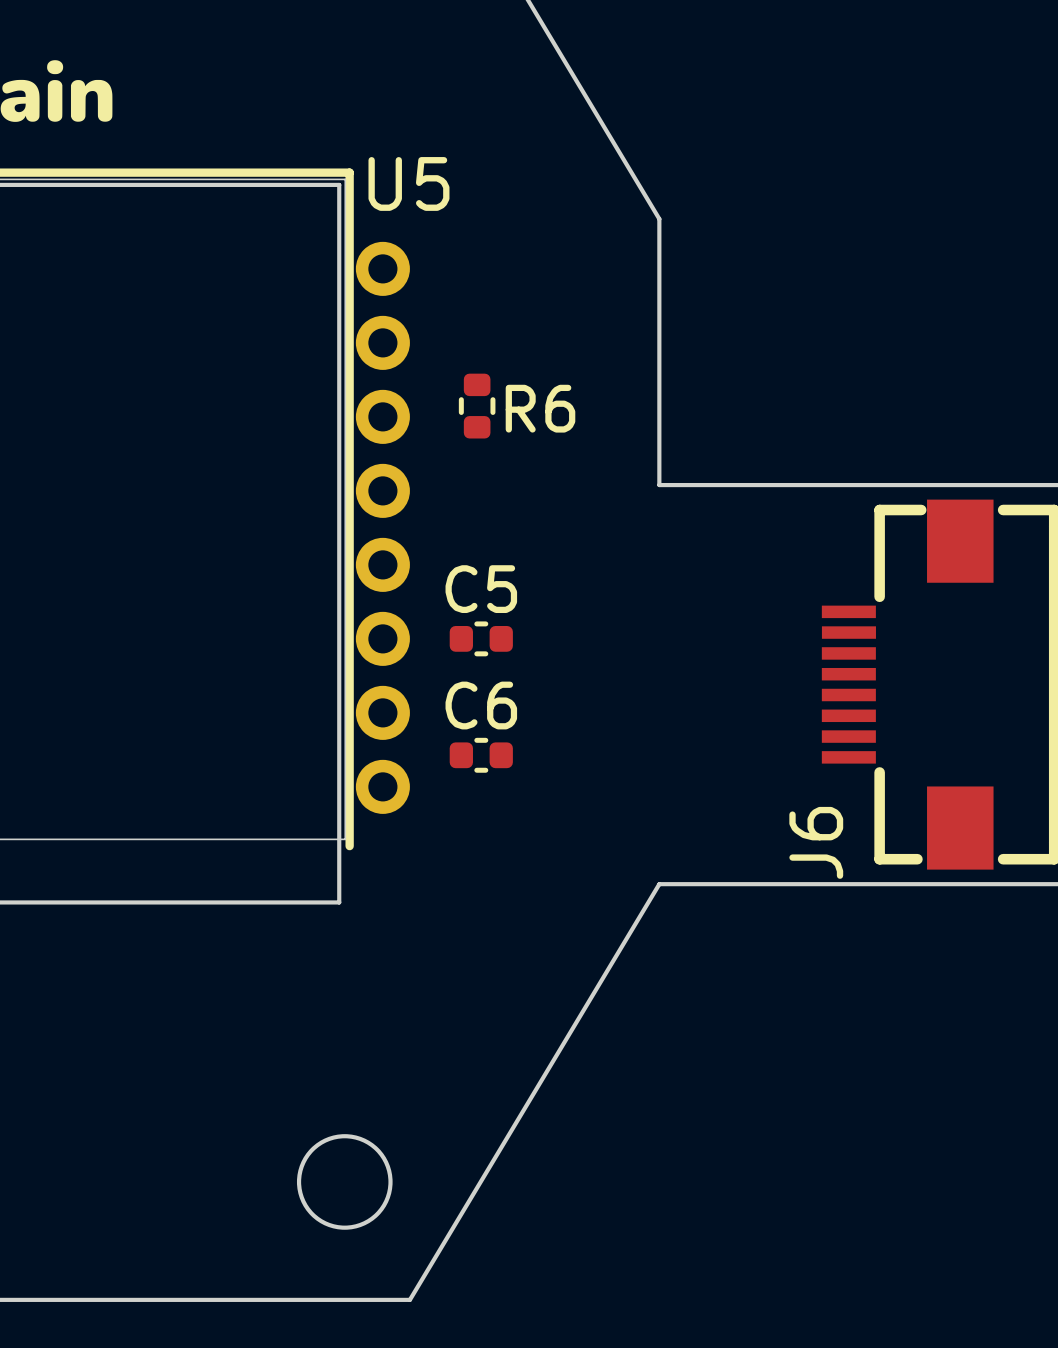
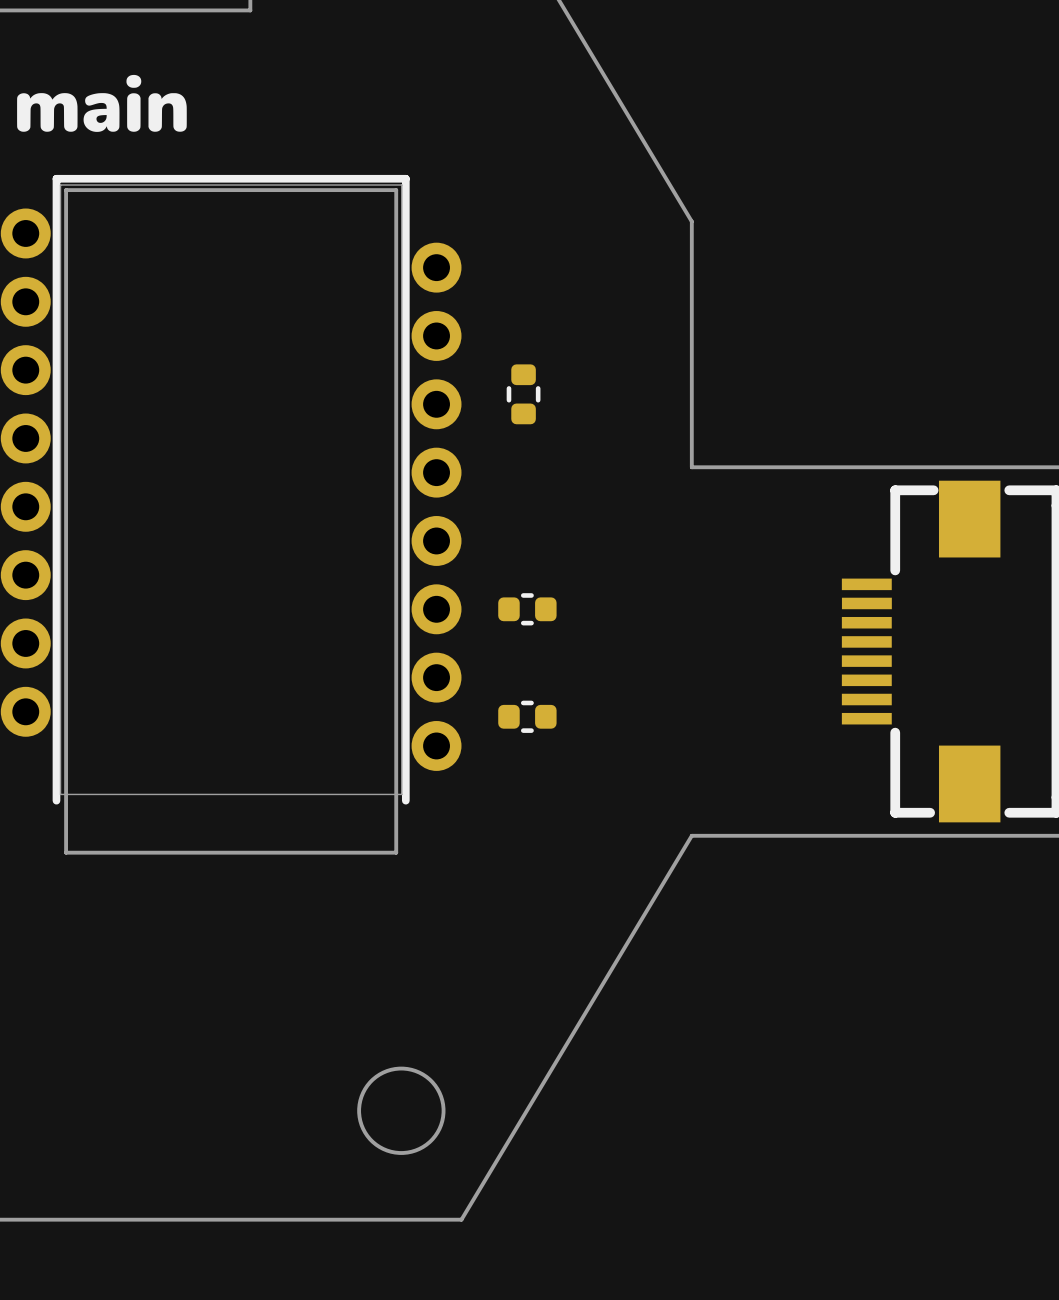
U5 name: U5 (408, 183) -> none
R6 name: R6 (540, 408) -> none
C5 name: C5 (481, 589) -> none
C6 name: C6 (481, 705) -> none
J6 name: J6 (816, 842) -> none

